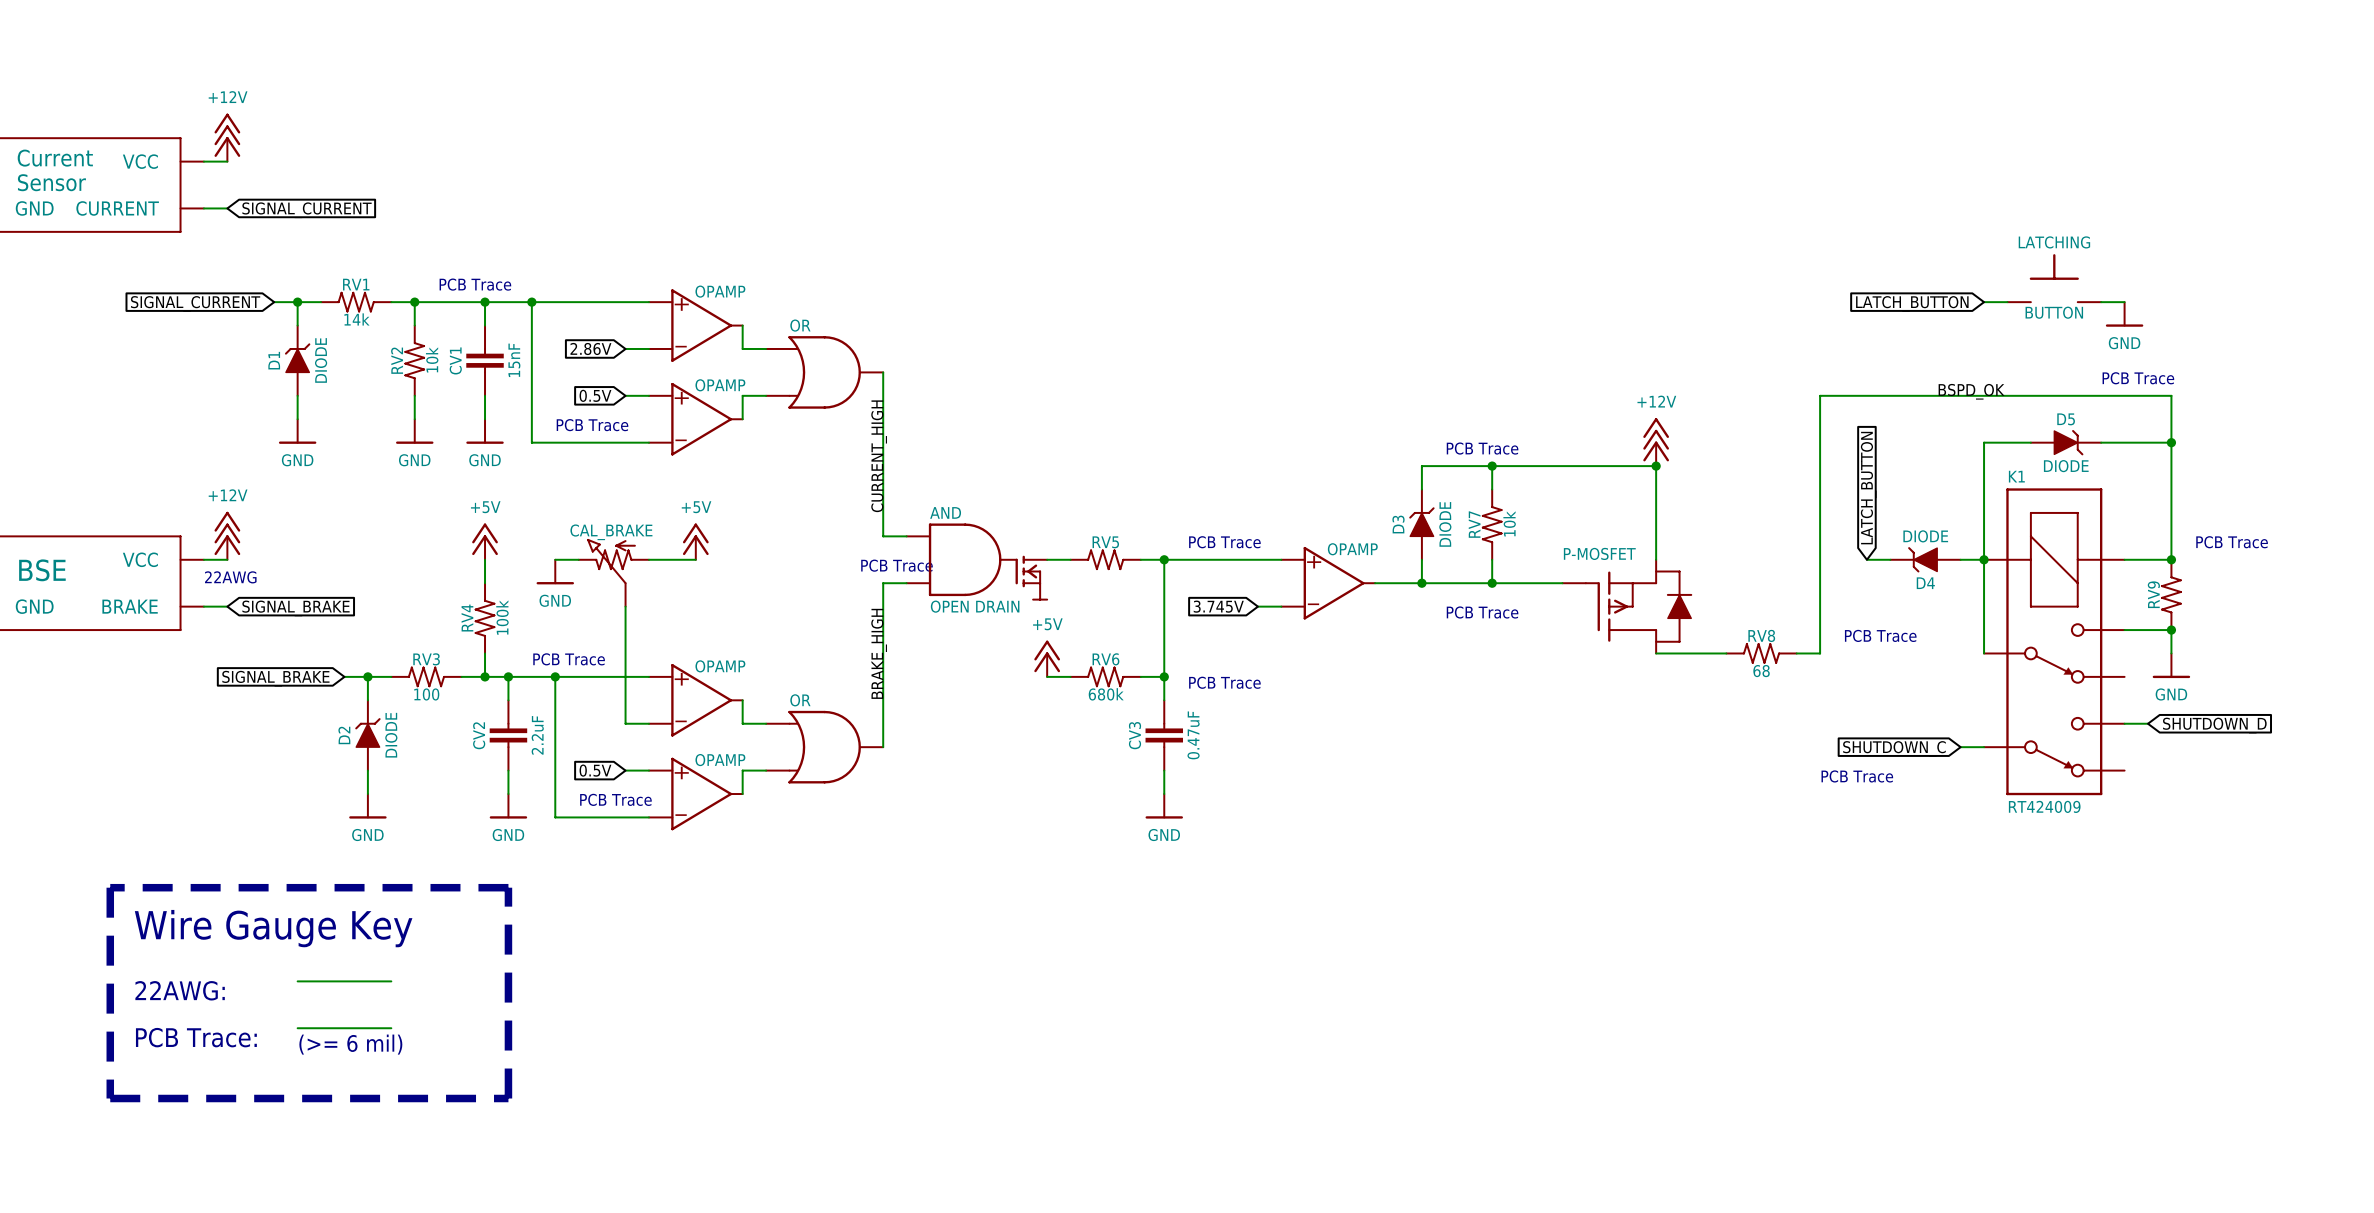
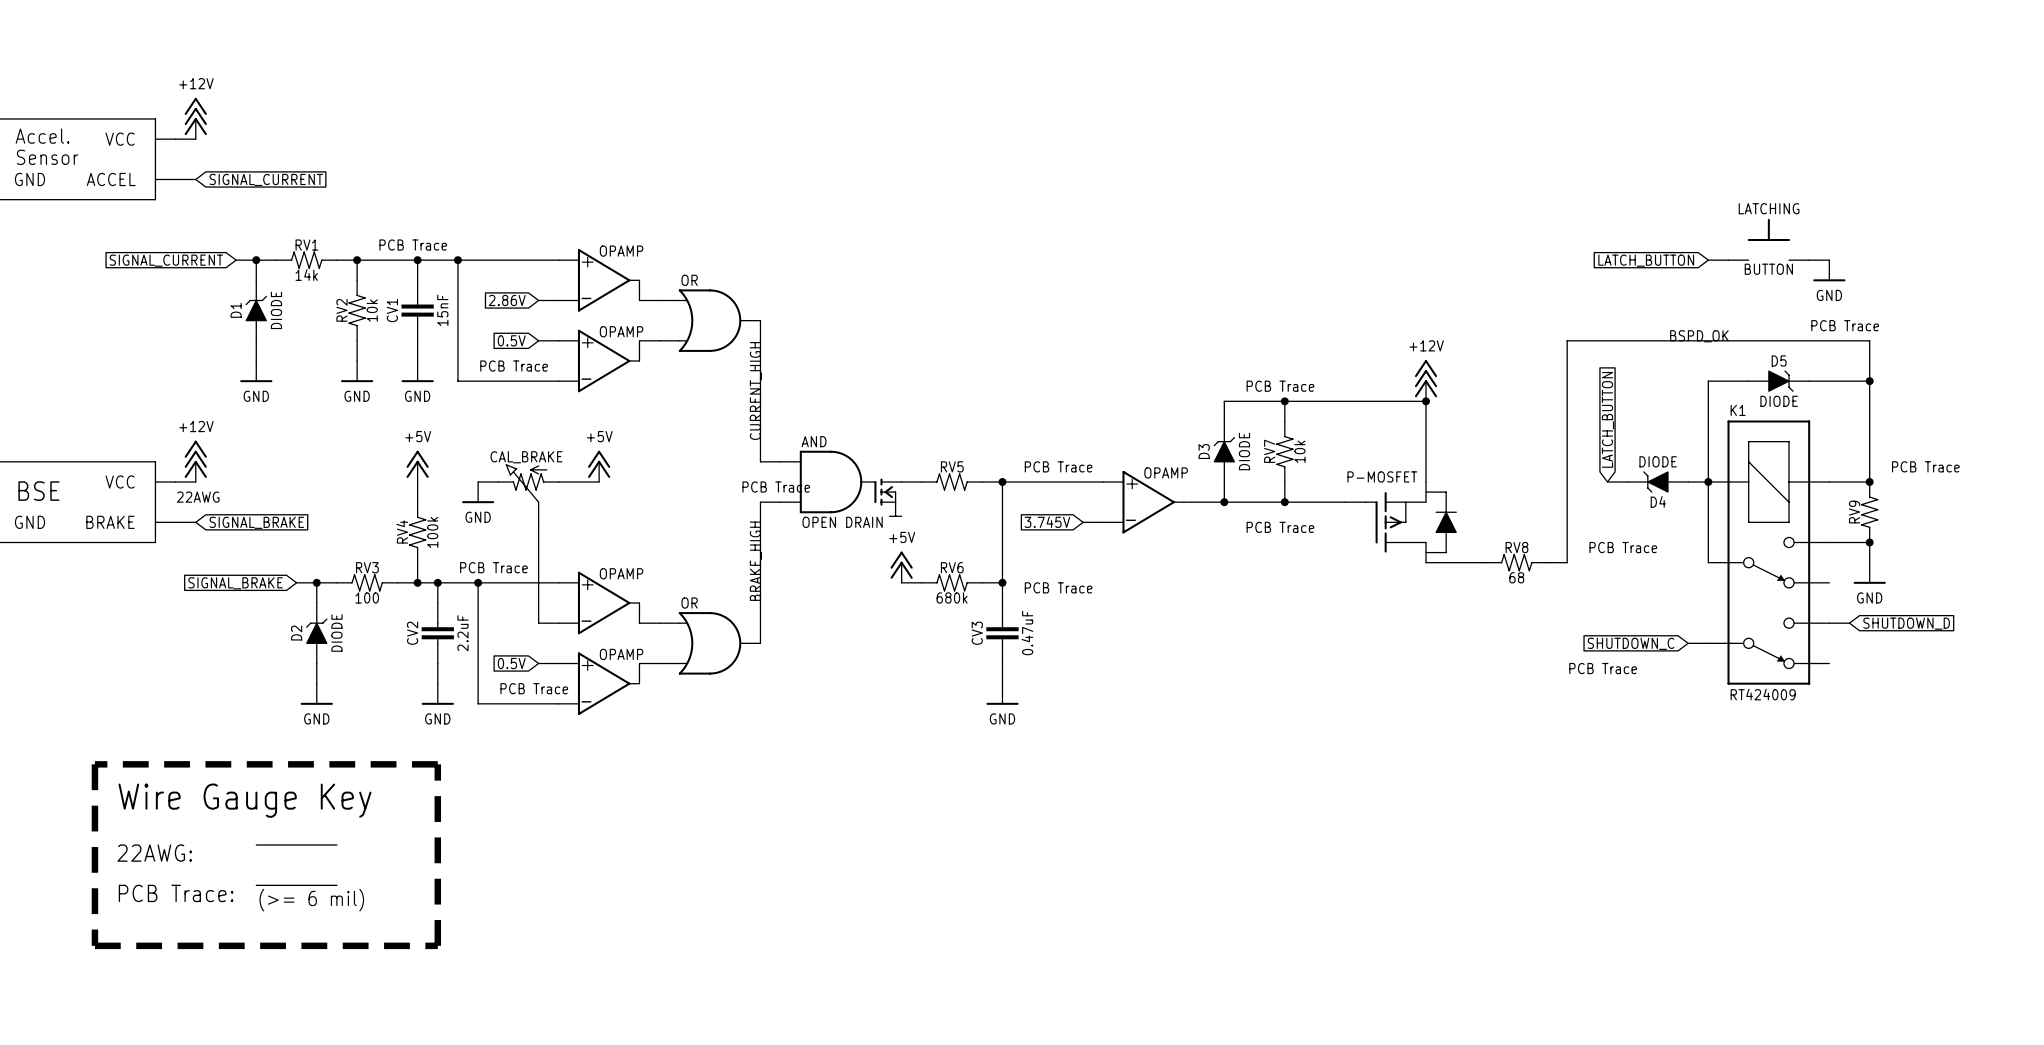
part text: Current (55, 158) -> Accel. (42, 136)
part pin name: CURRENT (117, 208) -> ACCEL (111, 179)

